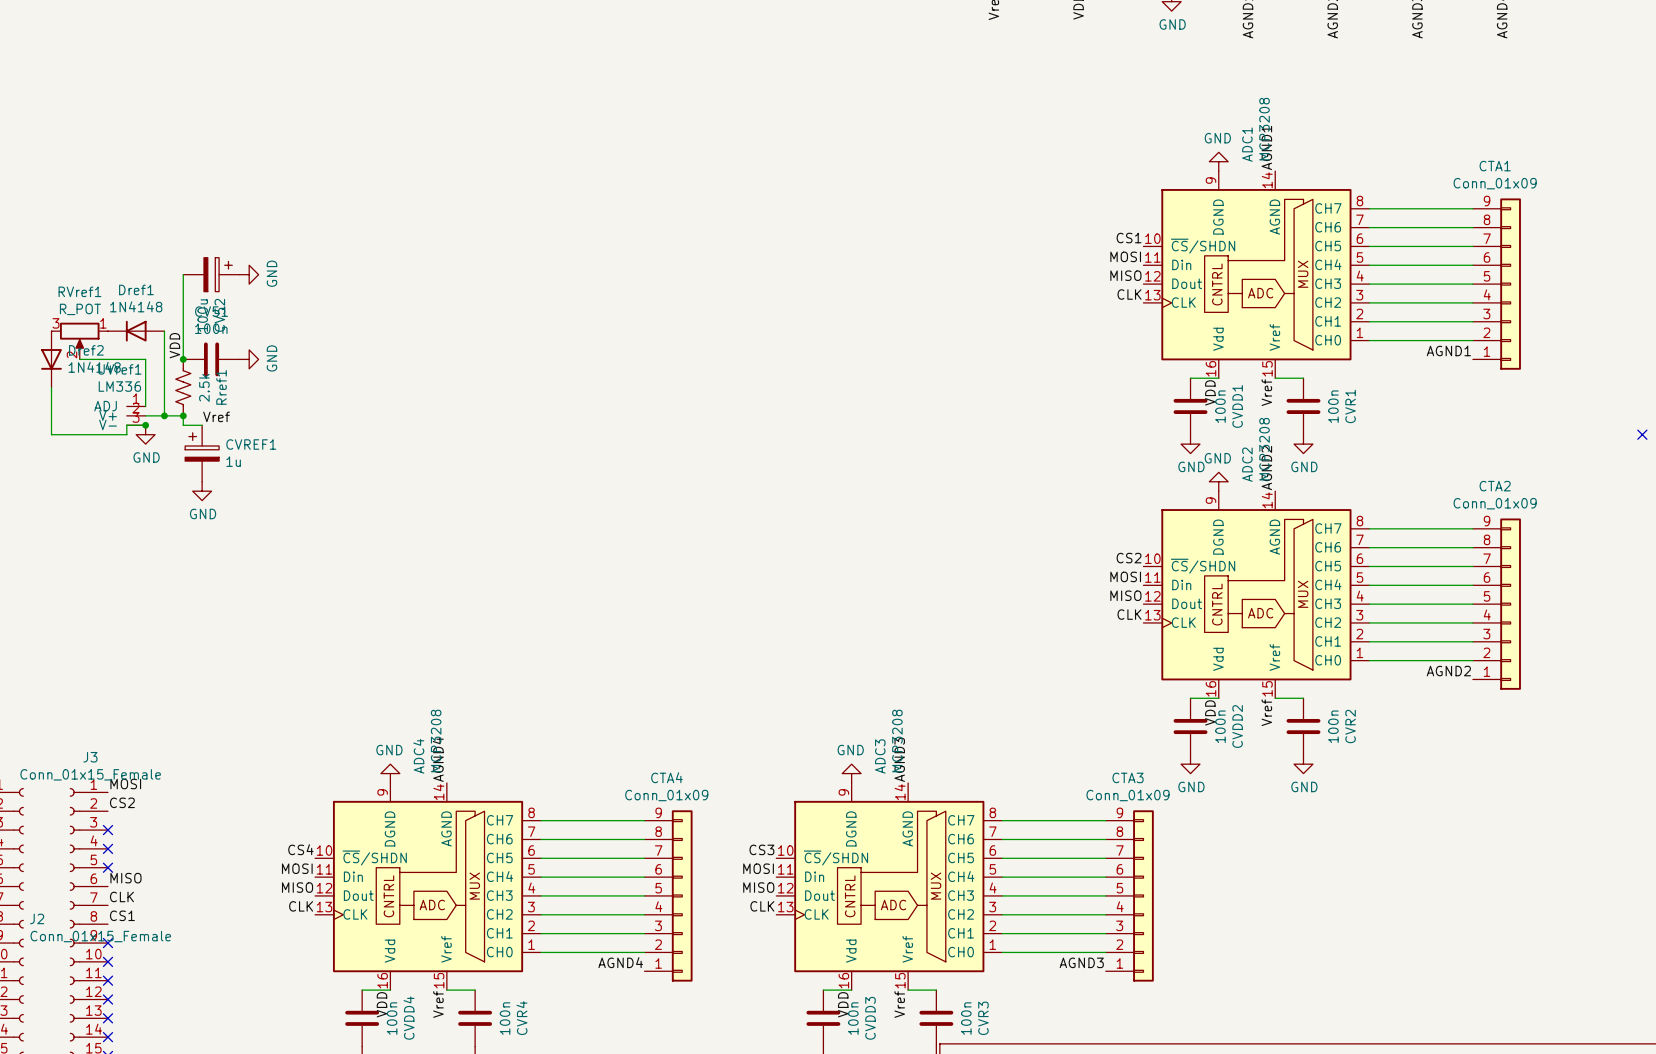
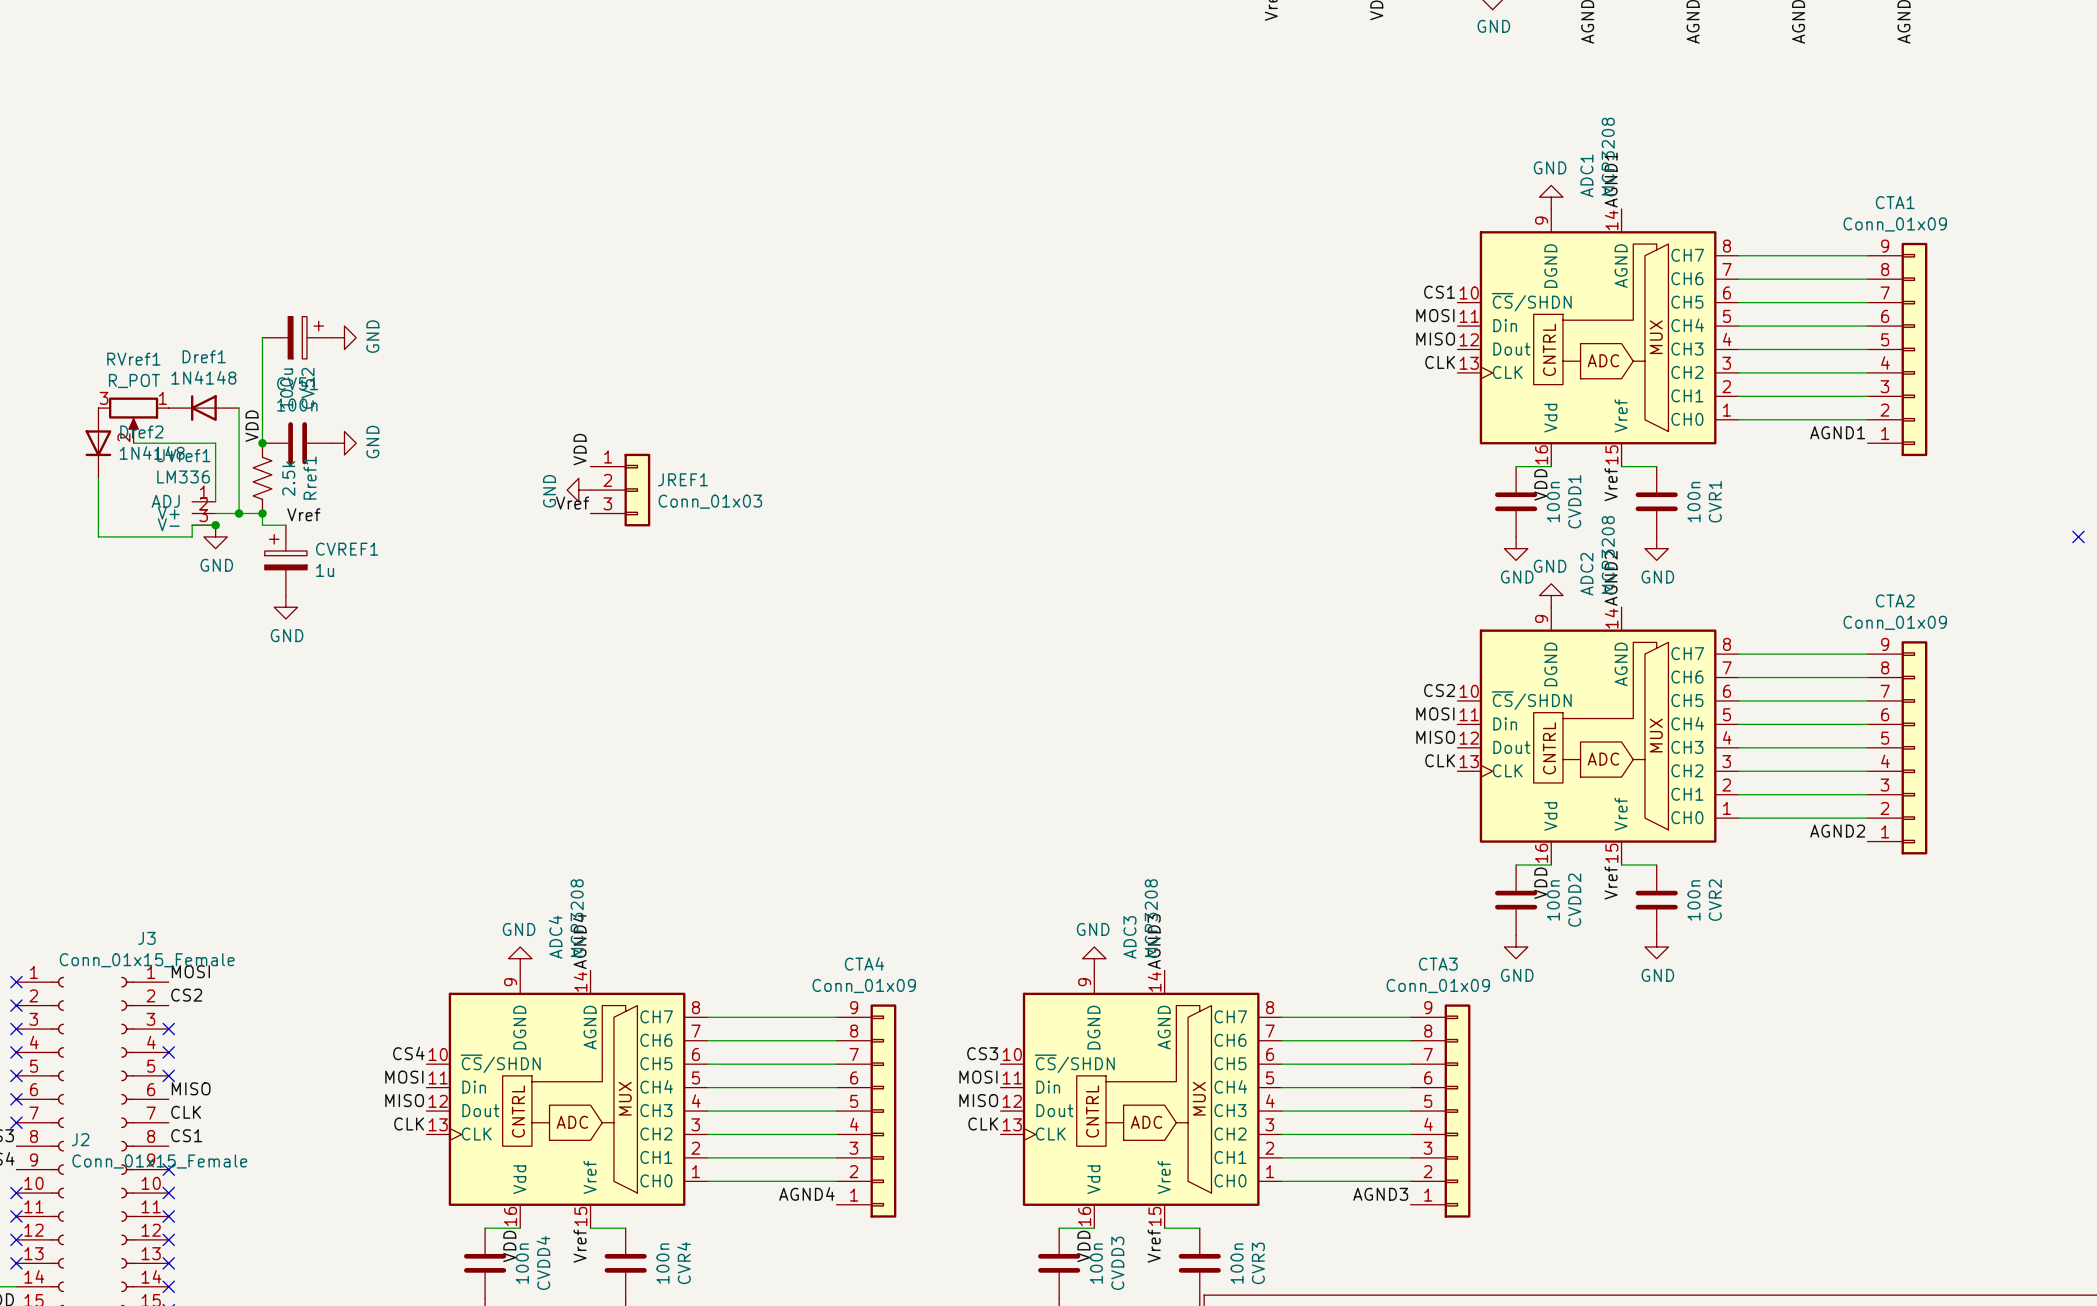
label: none -> VDD (580, 449)
power symbol: none -> GND (578, 490)
JREF1: none -> Conn_01x03 (620, 490)
label: none -> Vref (572, 503)

